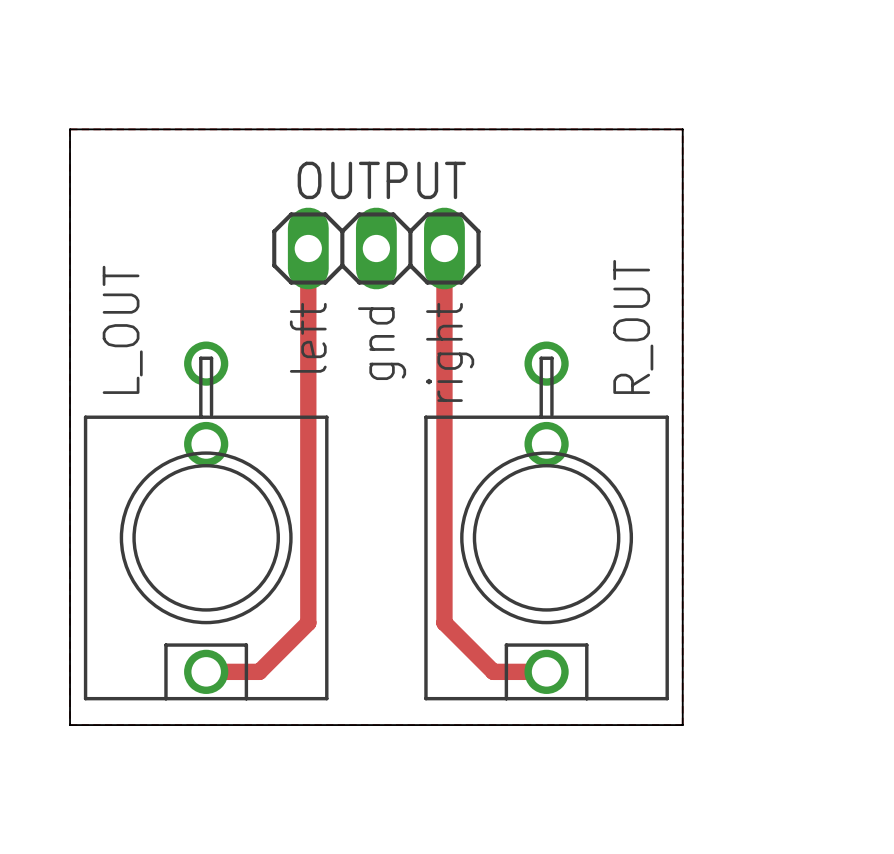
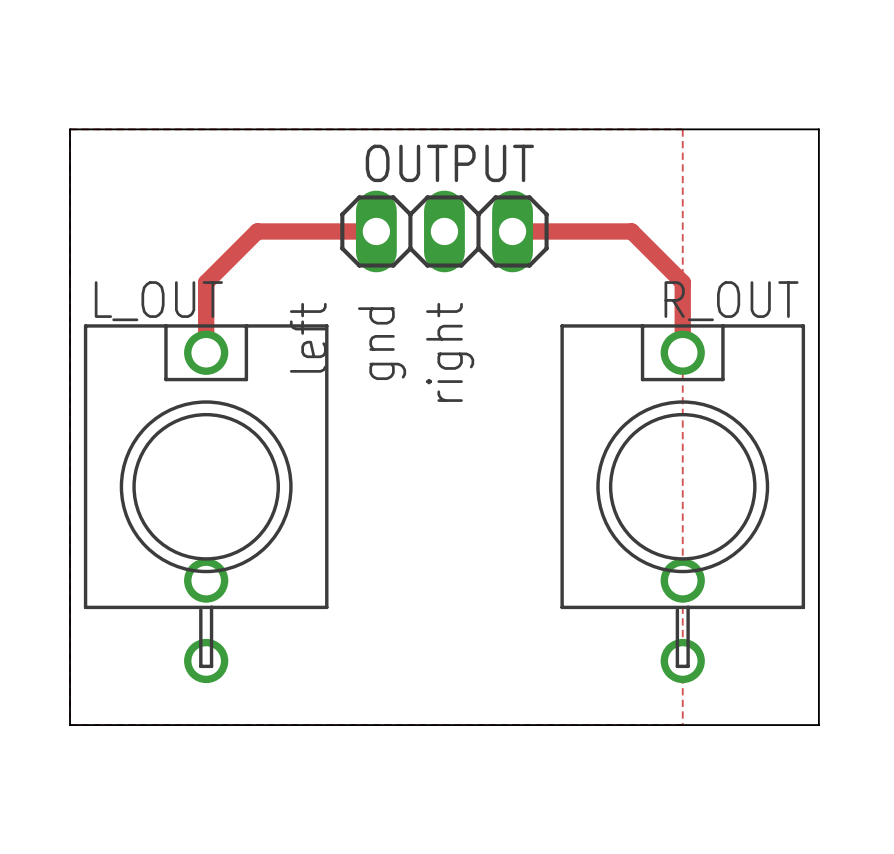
board edge: (682, 129) (682, 725) -> (682, 129) (818, 129) (818, 725) (682, 725)
track: none -> (376, 231) (257, 231) (206, 282) (206, 352)
track: none -> (512, 231) (631, 231) (682, 282) (682, 352)
track: (308, 248) (308, 622) (259, 671) (206, 671) -> none
OUTPUT position: (376, 248) -> (444, 231)
track: (444, 248) (444, 622) (493, 671) (546, 671) -> none
L_OUT rotation: 0° (206, 520) -> 180° (206, 503)
R_OUT rotation: 0° (546, 520) -> 180° (682, 503)

